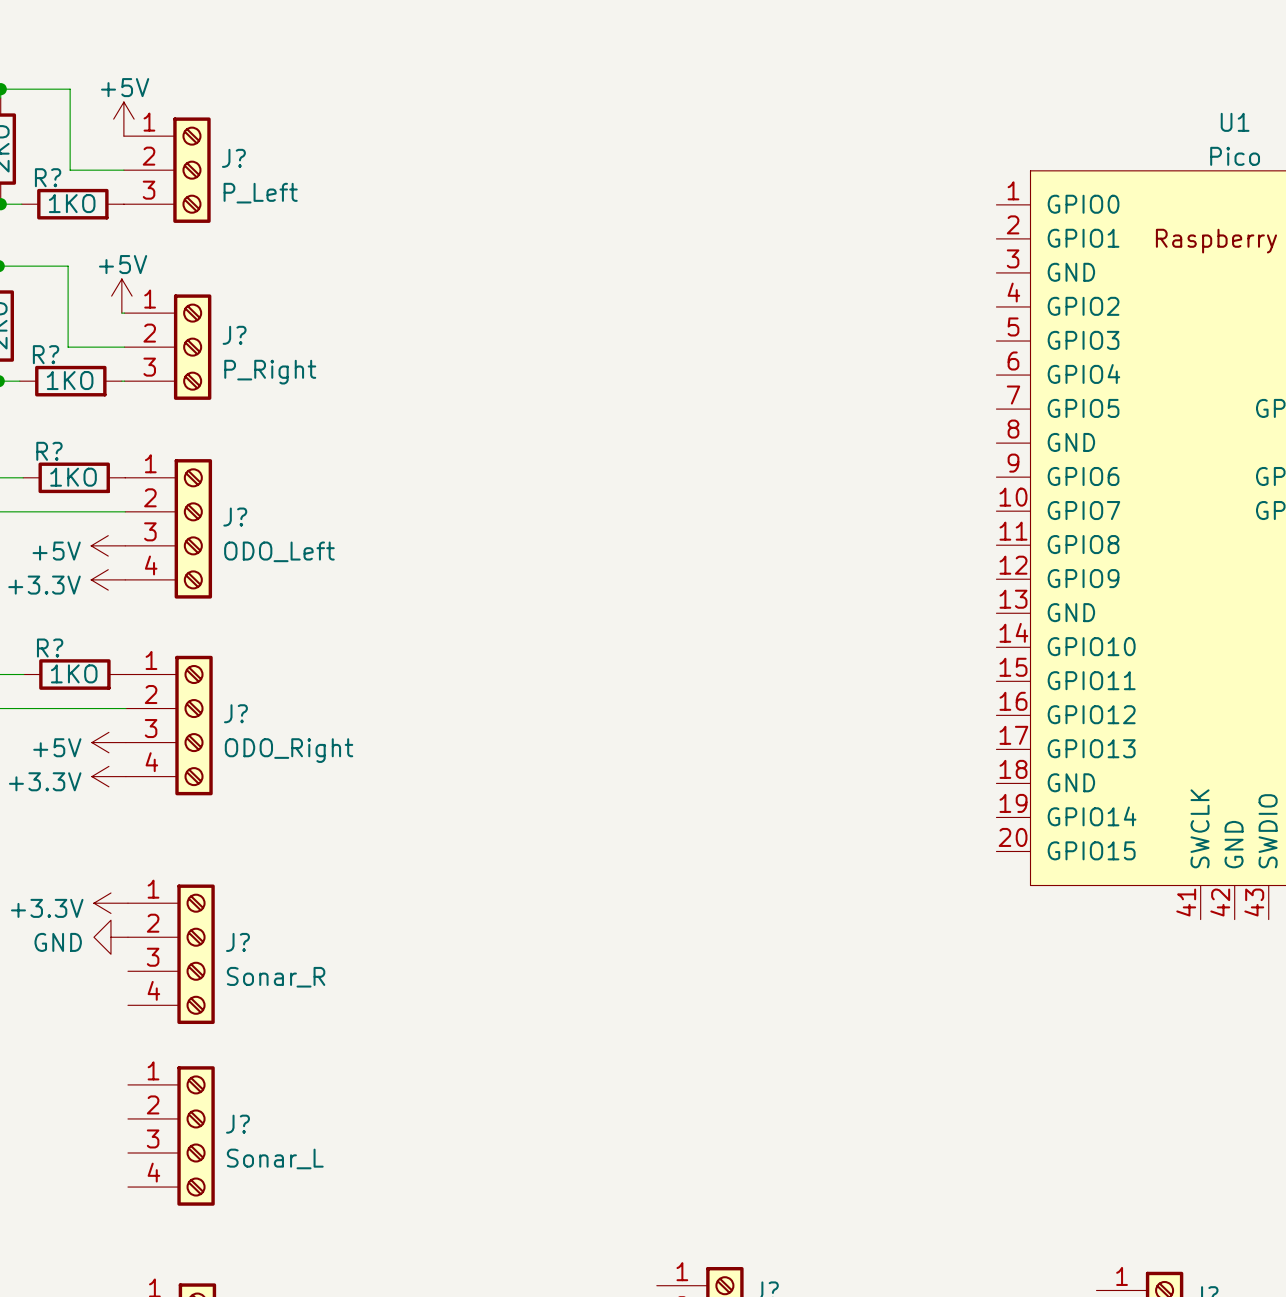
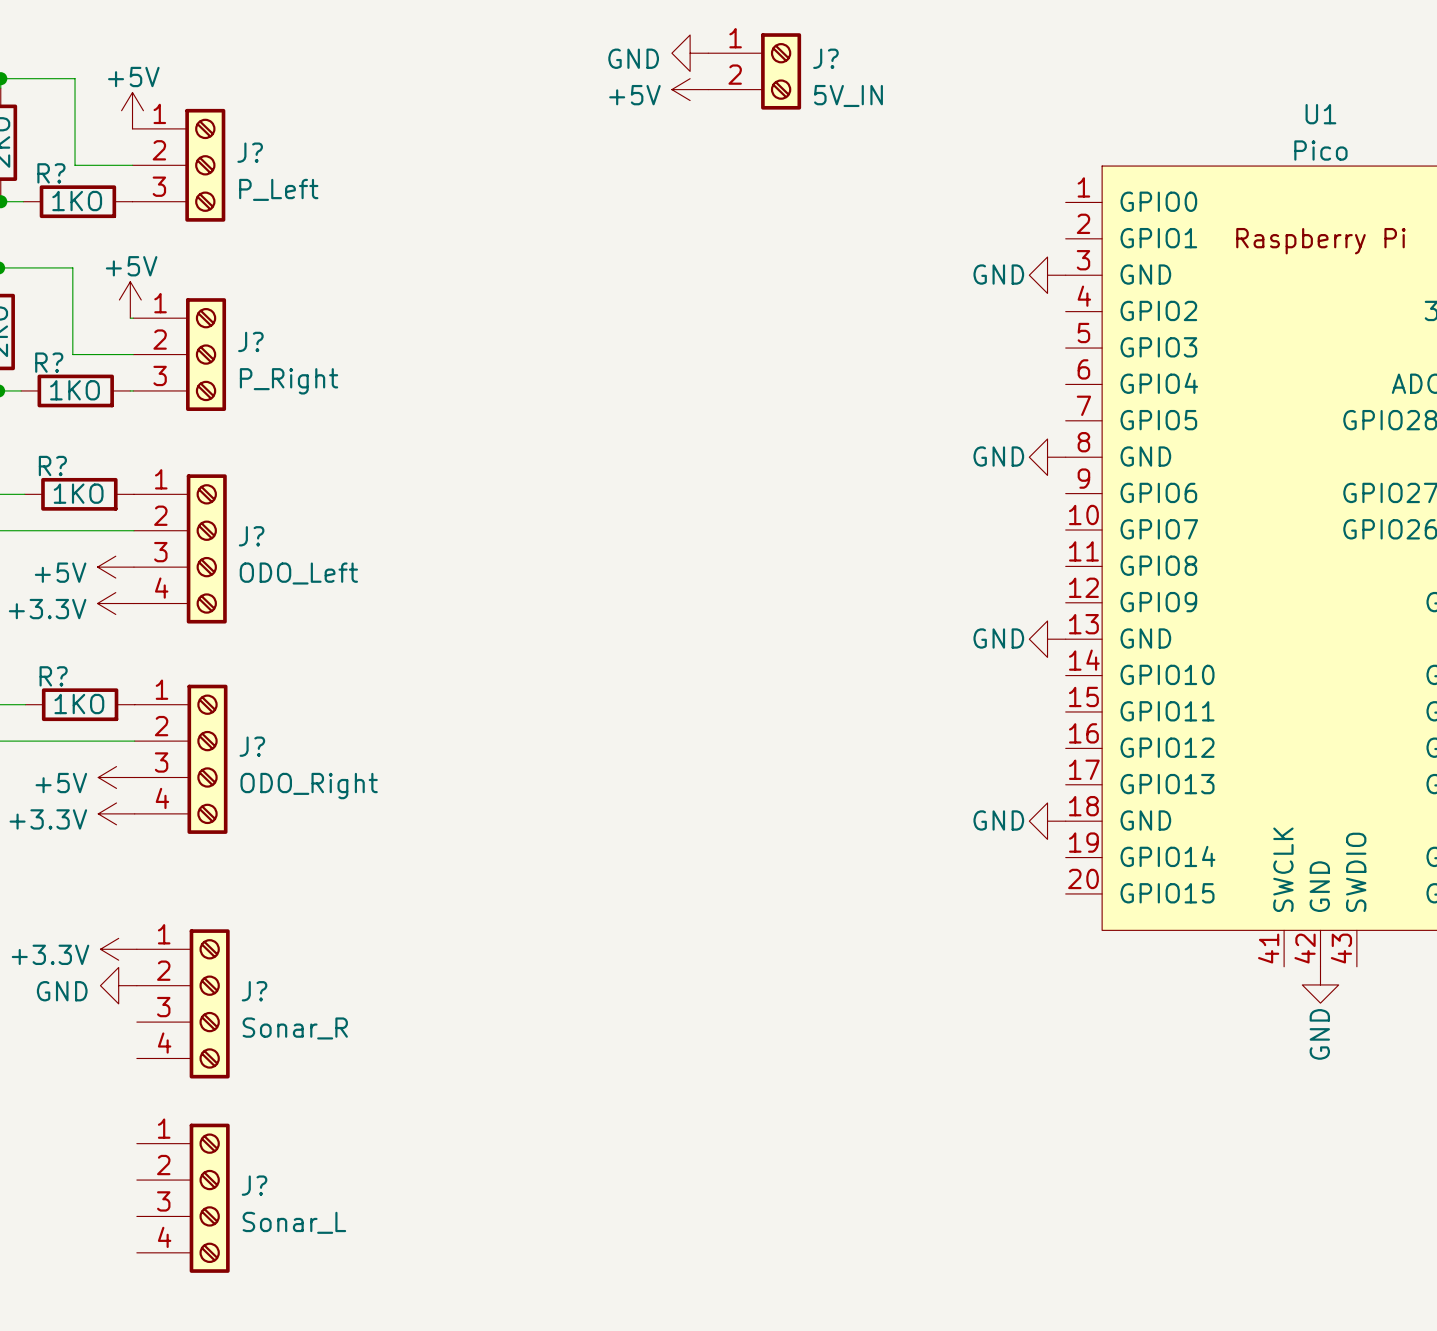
power symbol: none -> GND (690, 53)
J?: none -> 5V_IN (754, 71)
power symbol: none -> +5V (690, 89)
power symbol: none -> GND (1047, 275)
power symbol: none -> GND (1047, 457)
power symbol: none -> GND (1047, 639)
power symbol: none -> GND (1047, 821)
power symbol: none -> GND (1320, 984)

